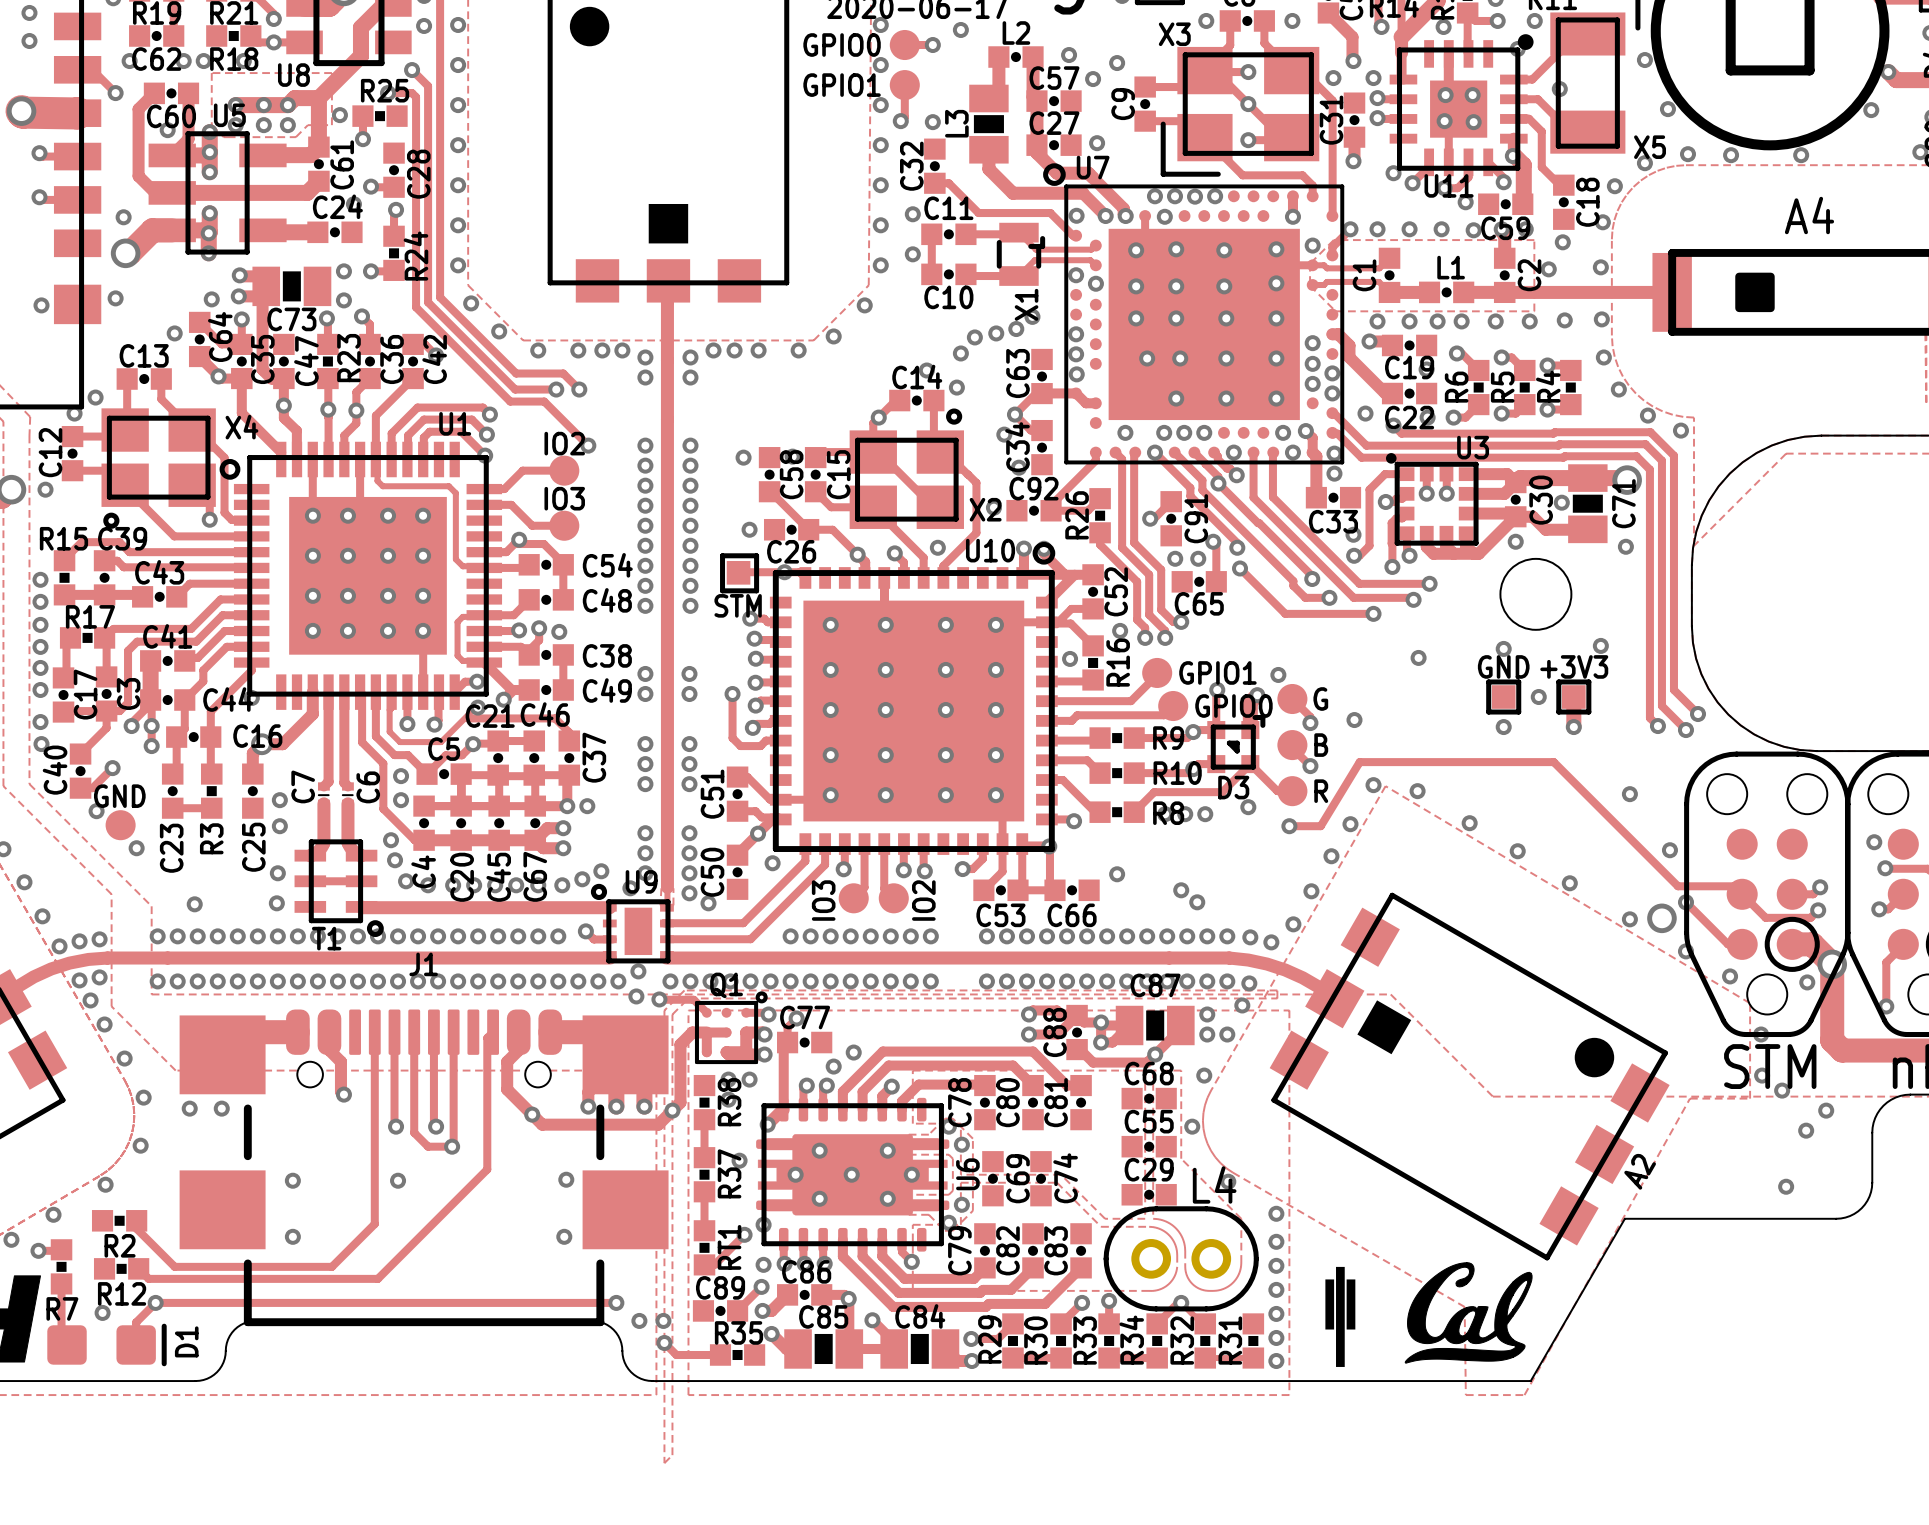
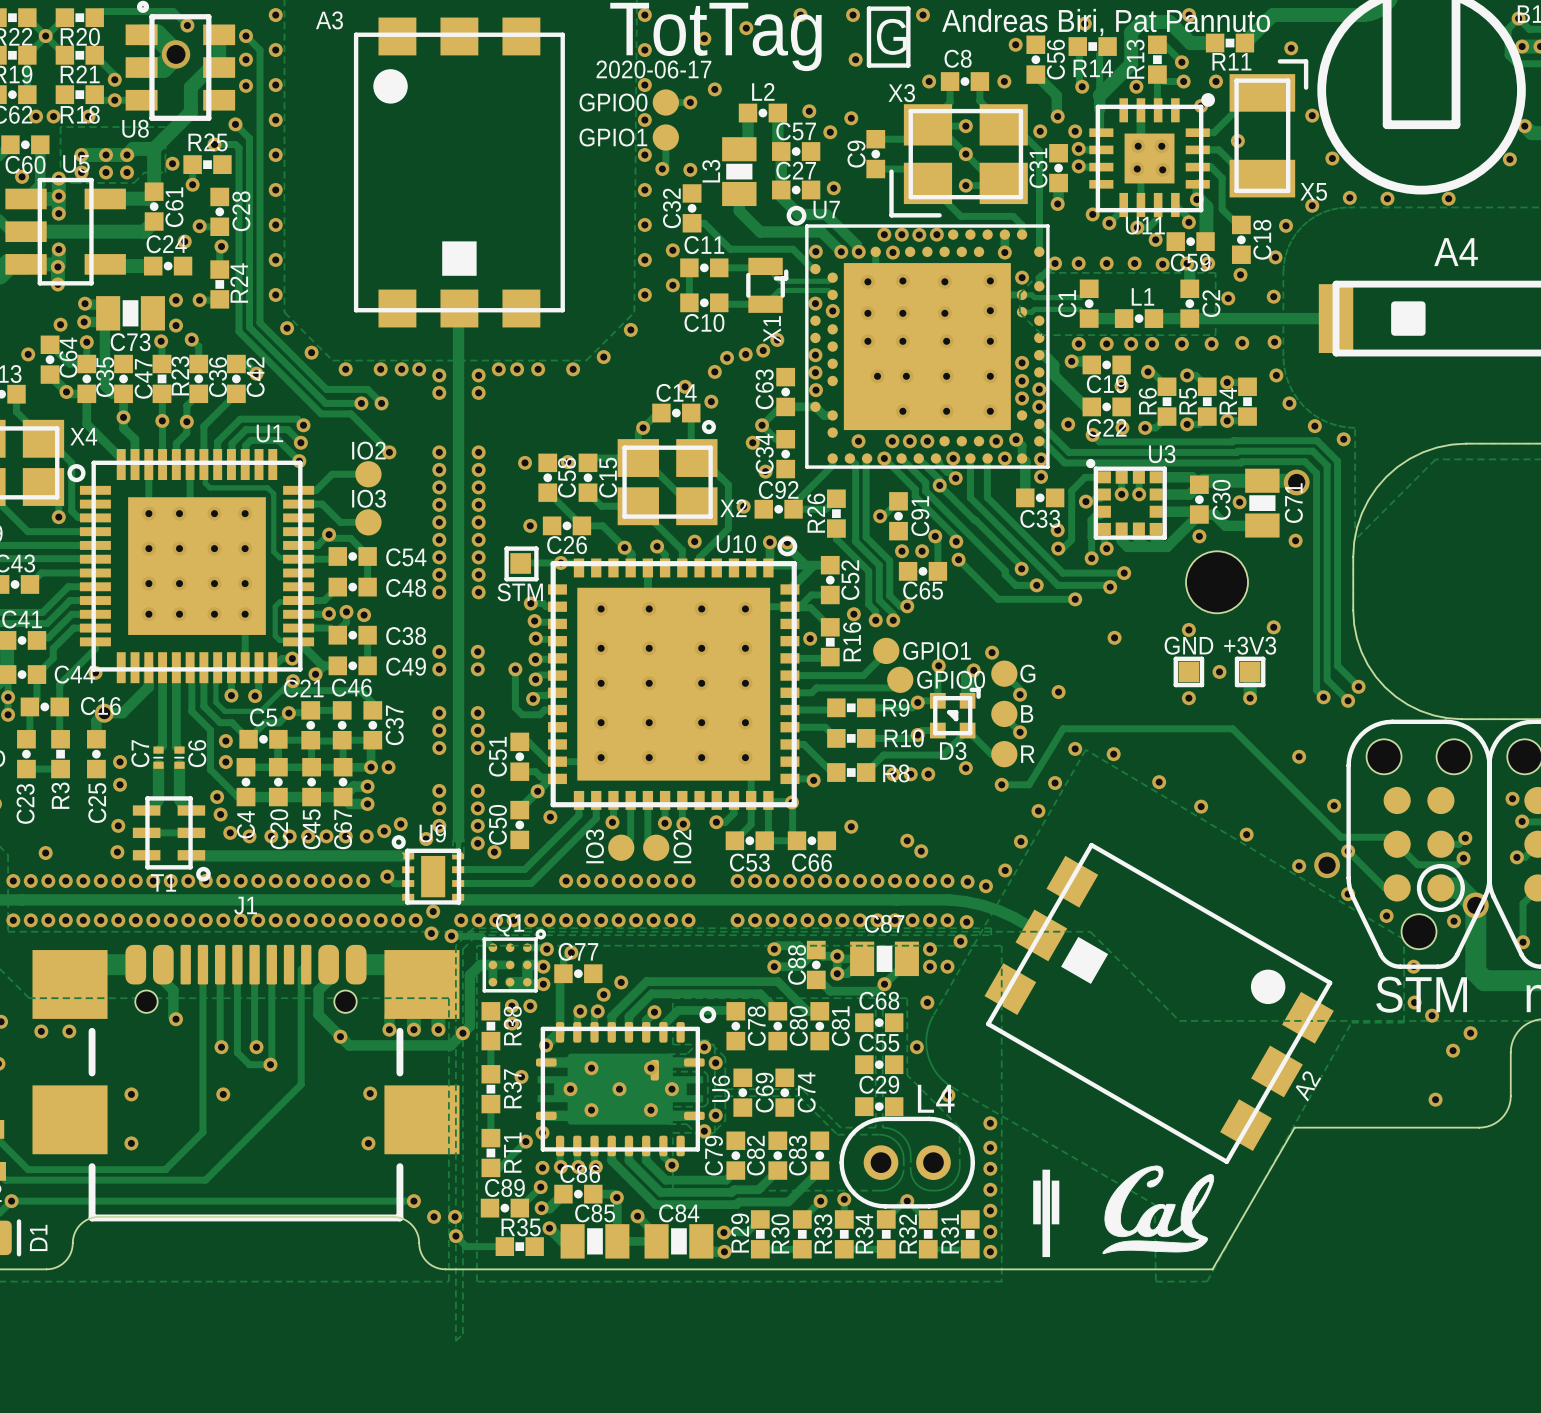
U6 footprint: [756, 1097, 950, 1252] -> [535, 1006, 717, 1157]
C78 name position: C78 (959, 1102) -> C78 (756, 1026)
C80 name position: C80 (1007, 1102) -> C80 (798, 1026)
C81 name position: C81 (1056, 1102) -> C81 (840, 1026)

